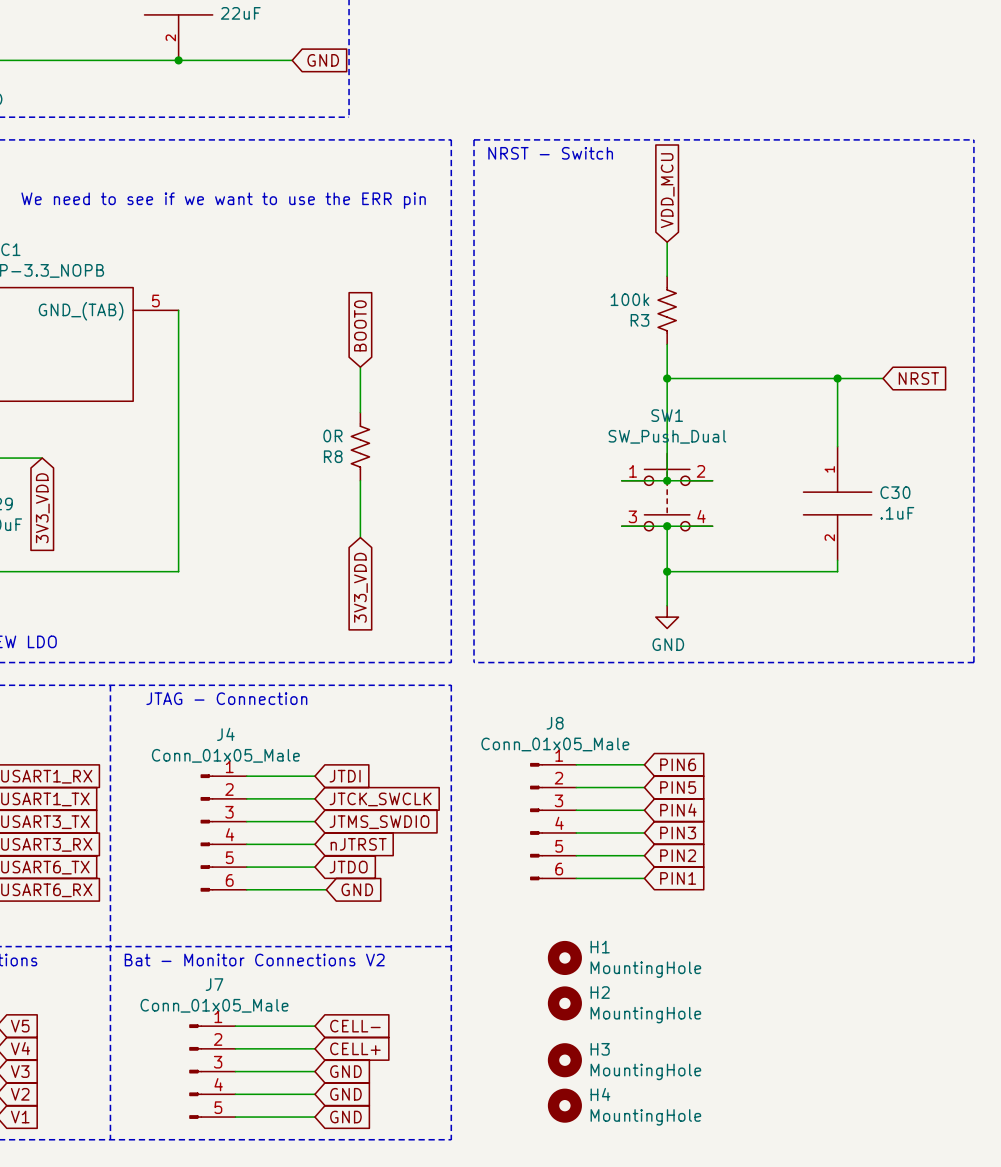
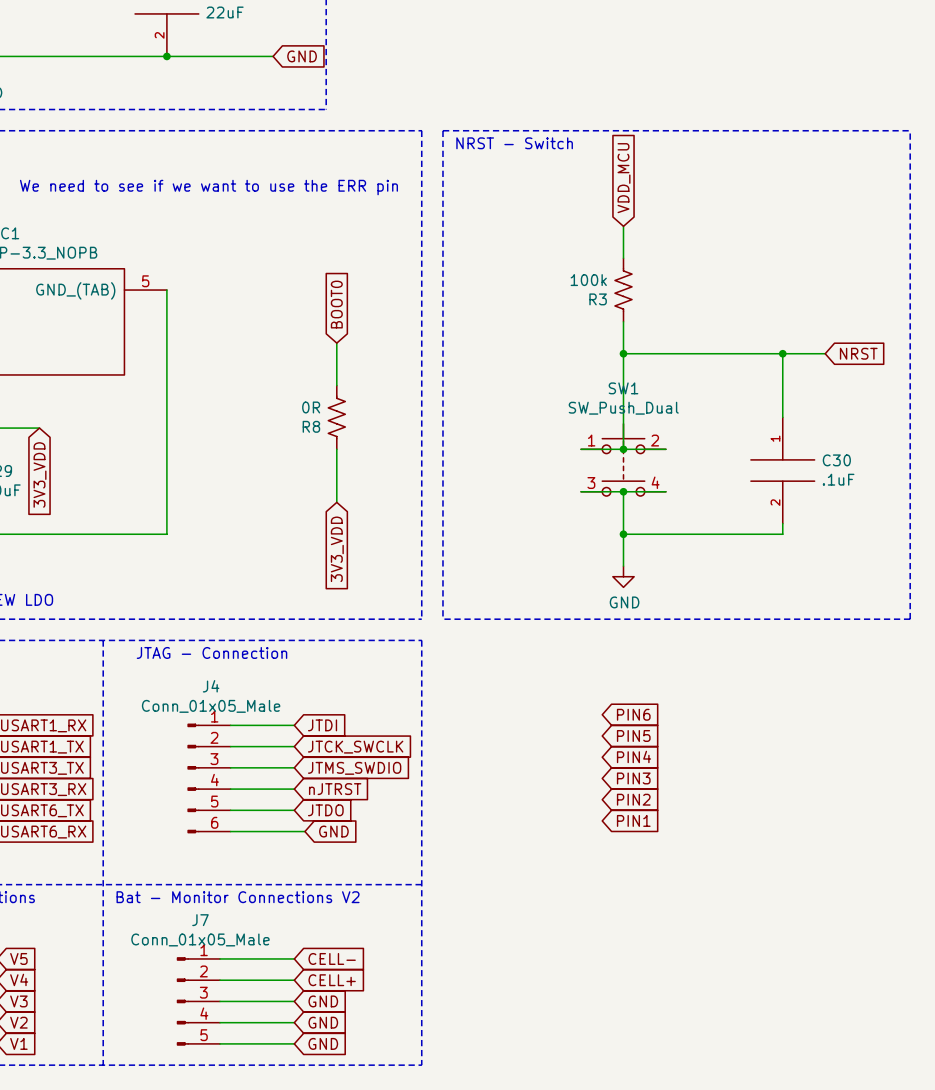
wire: (576, 764) (644, 764) -> none
wire: (576, 787) (644, 787) -> none
wire: (576, 810) (644, 810) -> none
J8: Conn_01x05_Male (553, 821) -> none
wire: (576, 832) (644, 832) -> none
wire: (576, 855) (644, 855) -> none
wire: (576, 878) (644, 878) -> none
H1: MountingHole (564, 957) -> none
H2: MountingHole (564, 1003) -> none
H3: MountingHole (564, 1060) -> none
H4: MountingHole (564, 1105) -> none

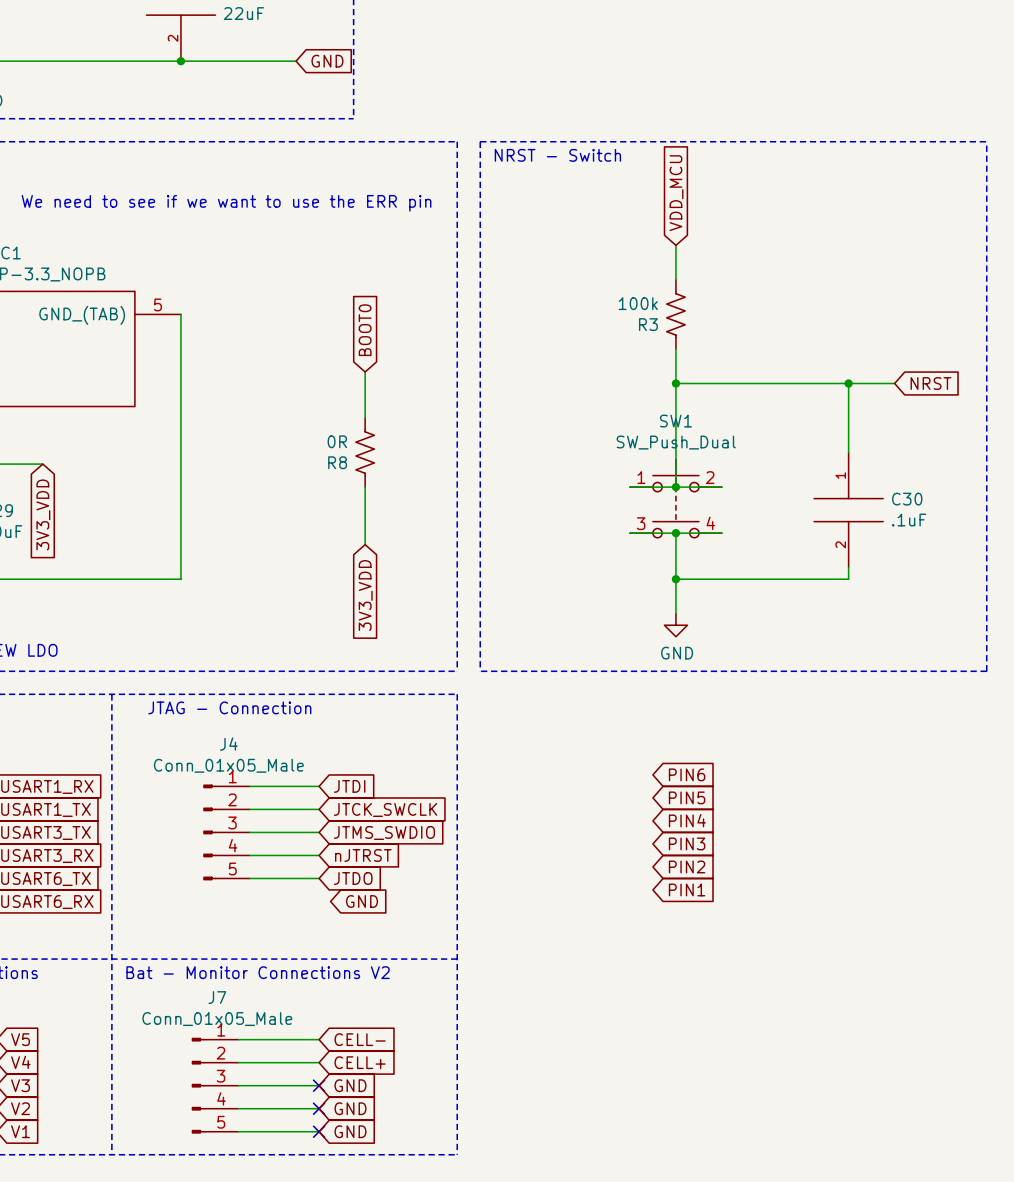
J4 symbol: [187, 723, 231, 834] -> [203, 784, 251, 881]
wire: (230, 831) (304, 831) -> none
no-connect mark: none -> (319, 1085)
no-connect mark: none -> (319, 1108)
no-connect mark: none -> (319, 1131)

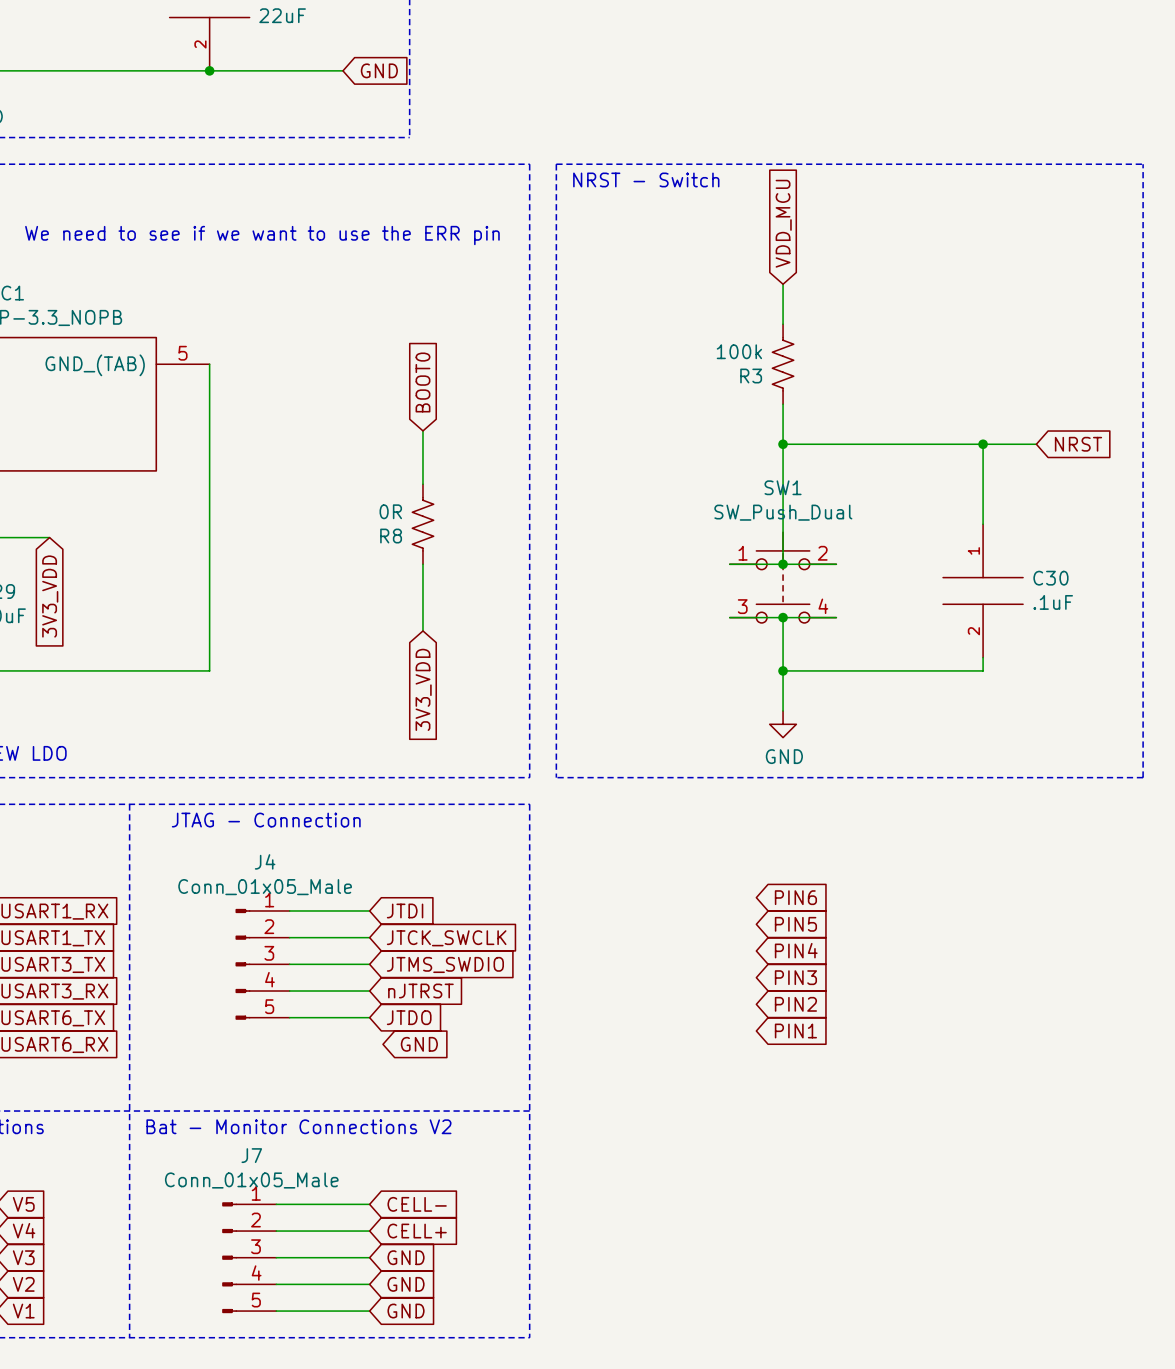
no-connect mark: (319, 1085) -> none
no-connect mark: (319, 1108) -> none
no-connect mark: (319, 1131) -> none

